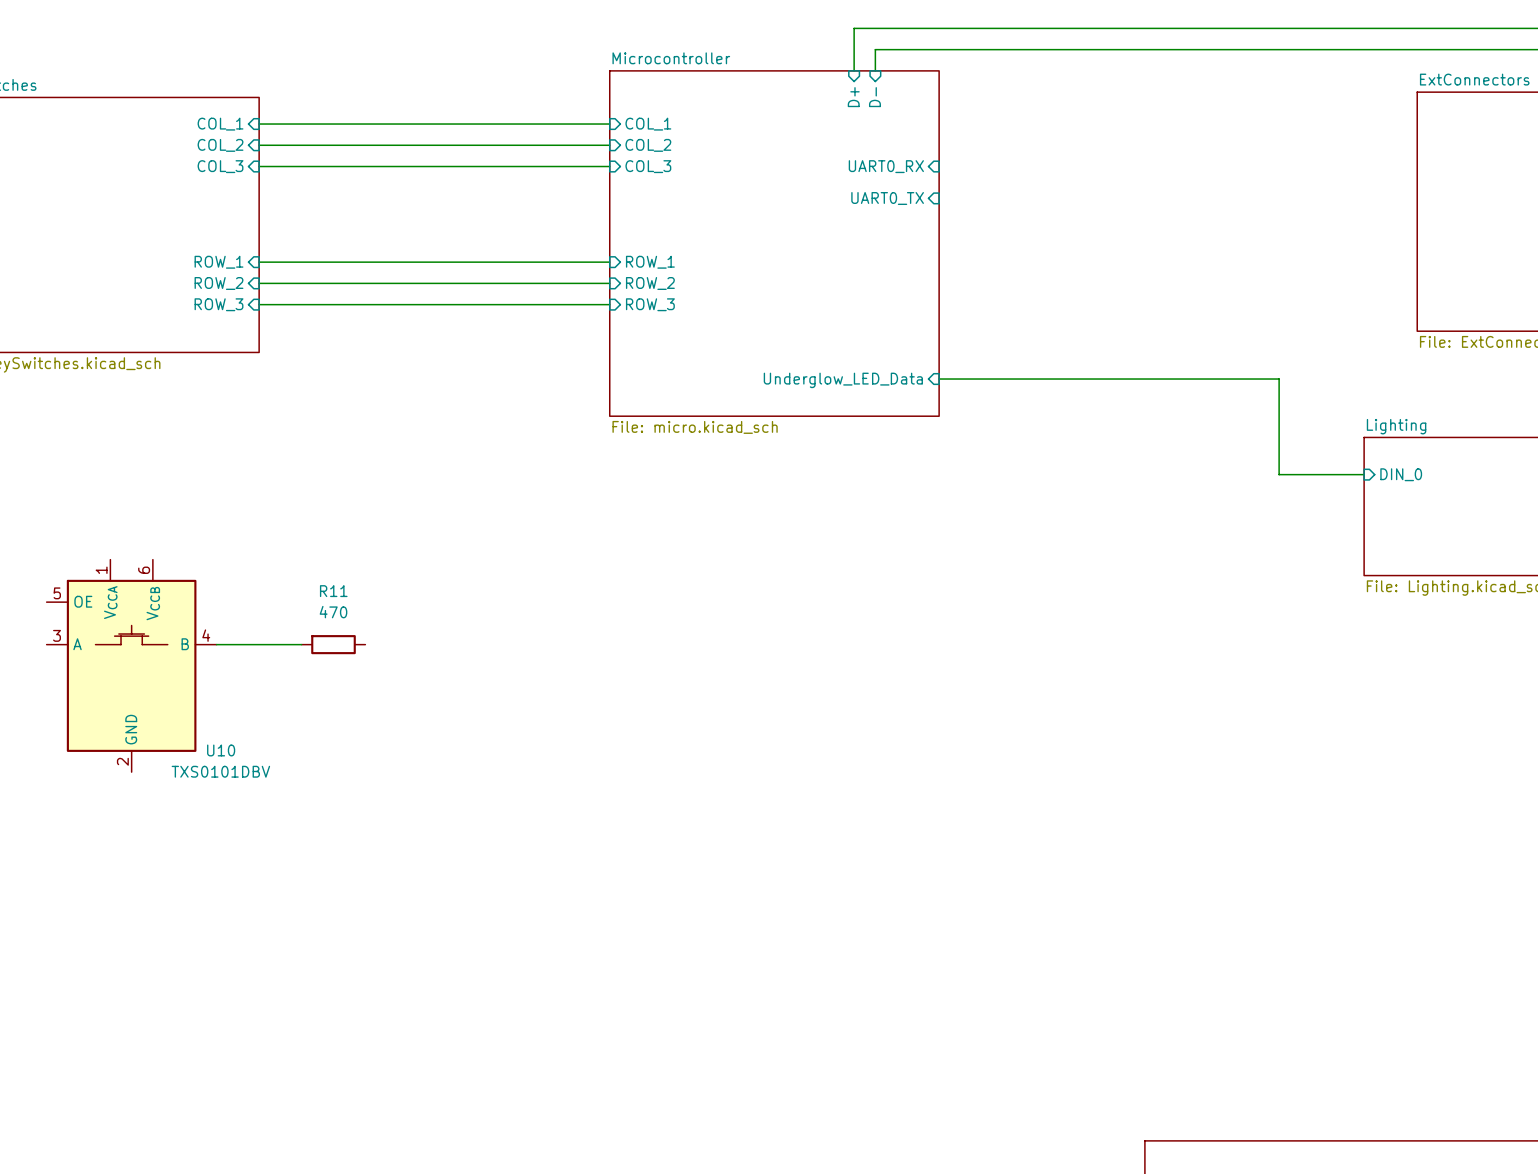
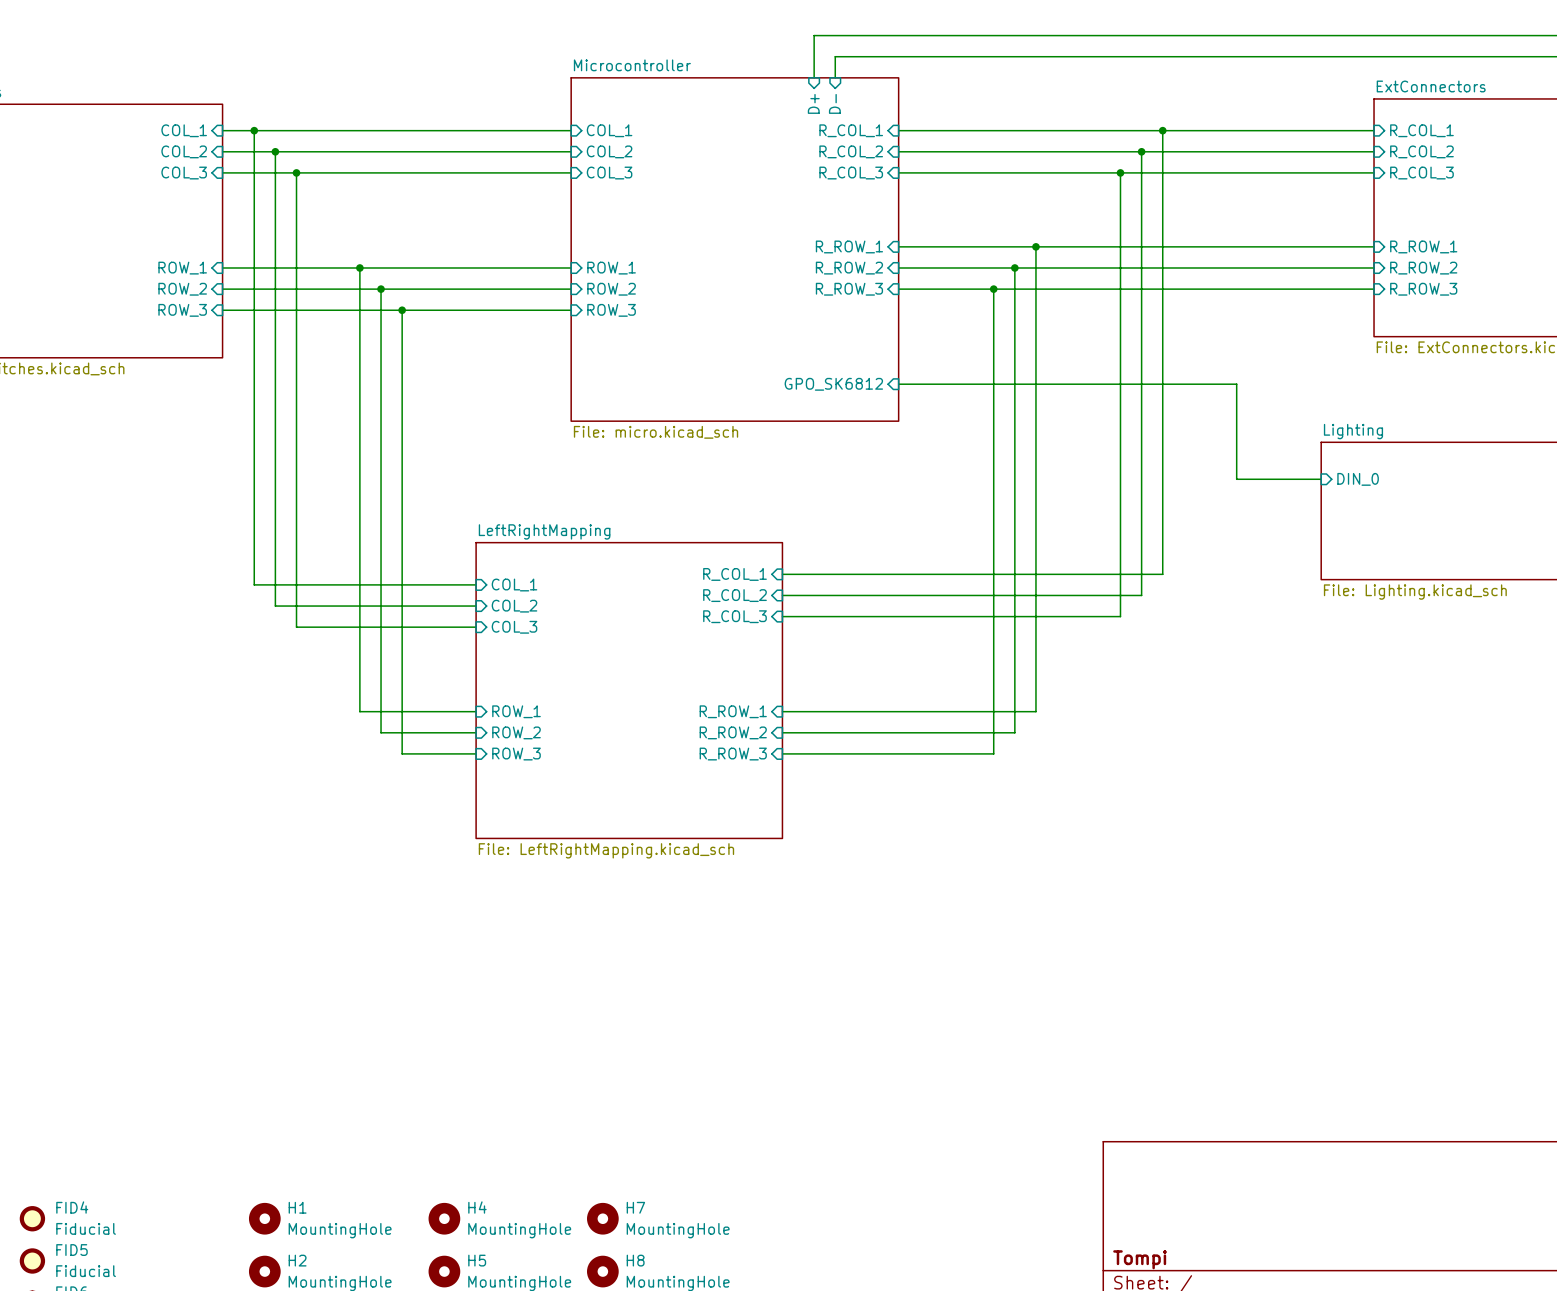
wire: none -> (254, 130) (254, 584) (476, 584)
junction: none -> (254, 130)
sheet pin: none -> R_COL_1 (851, 130)
wire: none -> (898, 130) (1374, 130)
wire: none -> (1162, 130) (1162, 574) (782, 574)
junction: none -> (1162, 130)
sheet pin: none -> R_COL_1 (1421, 130)
wire: none -> (275, 151) (275, 606) (476, 606)
junction: none -> (275, 151)
sheet pin: none -> R_COL_2 (851, 151)
wire: none -> (898, 151) (1374, 151)
wire: none -> (1141, 151) (1141, 595) (782, 595)
junction: none -> (1141, 151)
sheet pin: none -> R_COL_2 (1421, 151)
wire: none -> (296, 172) (296, 627) (476, 627)
junction: none -> (296, 172)
sheet pin: UART0_RX (886, 166) -> R_COL_3 (851, 173)
wire: none -> (898, 172) (1374, 172)
wire: none -> (1120, 172) (1120, 616) (782, 616)
junction: none -> (1120, 172)
sheet pin: none -> R_COL_3 (1421, 173)
sheet pin: UART0_TX (887, 198) -> none
wire: none -> (898, 246) (1374, 246)
wire: none -> (1035, 246) (1035, 711) (782, 711)
junction: none -> (1035, 246)
sheet pin: none -> R_ROW_1 (849, 246)
sheet pin: none -> R_ROW_1 (1423, 246)
wire: none -> (359, 267) (359, 711) (476, 711)
junction: none -> (359, 267)
sheet pin: none -> R_ROW_2 (849, 268)
wire: none -> (898, 267) (1374, 267)
wire: none -> (1014, 267) (1014, 732) (782, 732)
junction: none -> (1014, 267)
sheet pin: none -> R_ROW_2 (1423, 268)
wire: none -> (381, 289) (381, 732) (476, 732)
junction: none -> (381, 289)
sheet pin: none -> R_ROW_3 (849, 289)
wire: none -> (898, 289) (1374, 289)
wire: none -> (993, 289) (993, 753) (782, 753)
junction: none -> (993, 289)
sheet pin: none -> R_ROW_3 (1423, 289)
wire: none -> (402, 310) (402, 753) (476, 753)
junction: none -> (402, 310)
sheet pin: Underglow_LED_Data (843, 380) -> GPO_SK6812 (833, 384)
sheet pin: none -> R_COL_1 (734, 574)
sheet pin: none -> COL_1 (514, 585)
sheet pin: none -> R_COL_2 (734, 595)
sheet pin: none -> COL_2 (514, 606)
sheet pin: none -> R_COL_3 (734, 616)
sheet pin: none -> COL_3 (514, 627)
wire: (216, 644) (301, 644) -> none
R11: 470 (333, 644) -> none
U10: TXS0101DBV (131, 665) -> none
sheet LeftRightMapping: none -> File: LeftRightMapping.kicad_sch (629, 690)
sheet pin: none -> ROW_1 (516, 711)
sheet pin: none -> R_ROW_1 (733, 711)
sheet pin: none -> ROW_2 (516, 732)
sheet pin: none -> R_ROW_2 (733, 732)
sheet pin: none -> ROW_3 (516, 754)
sheet pin: none -> R_ROW_3 (733, 754)

